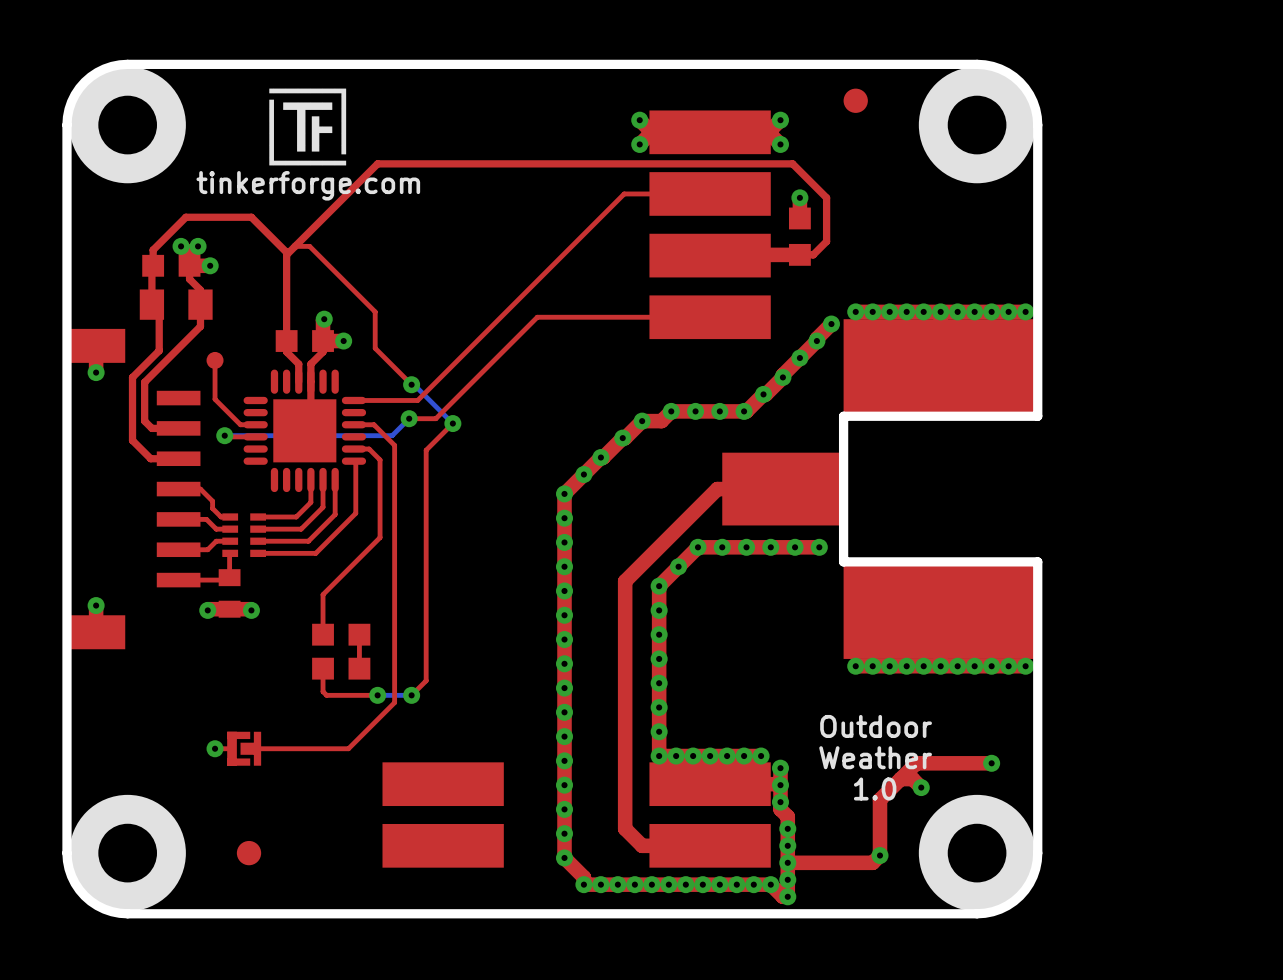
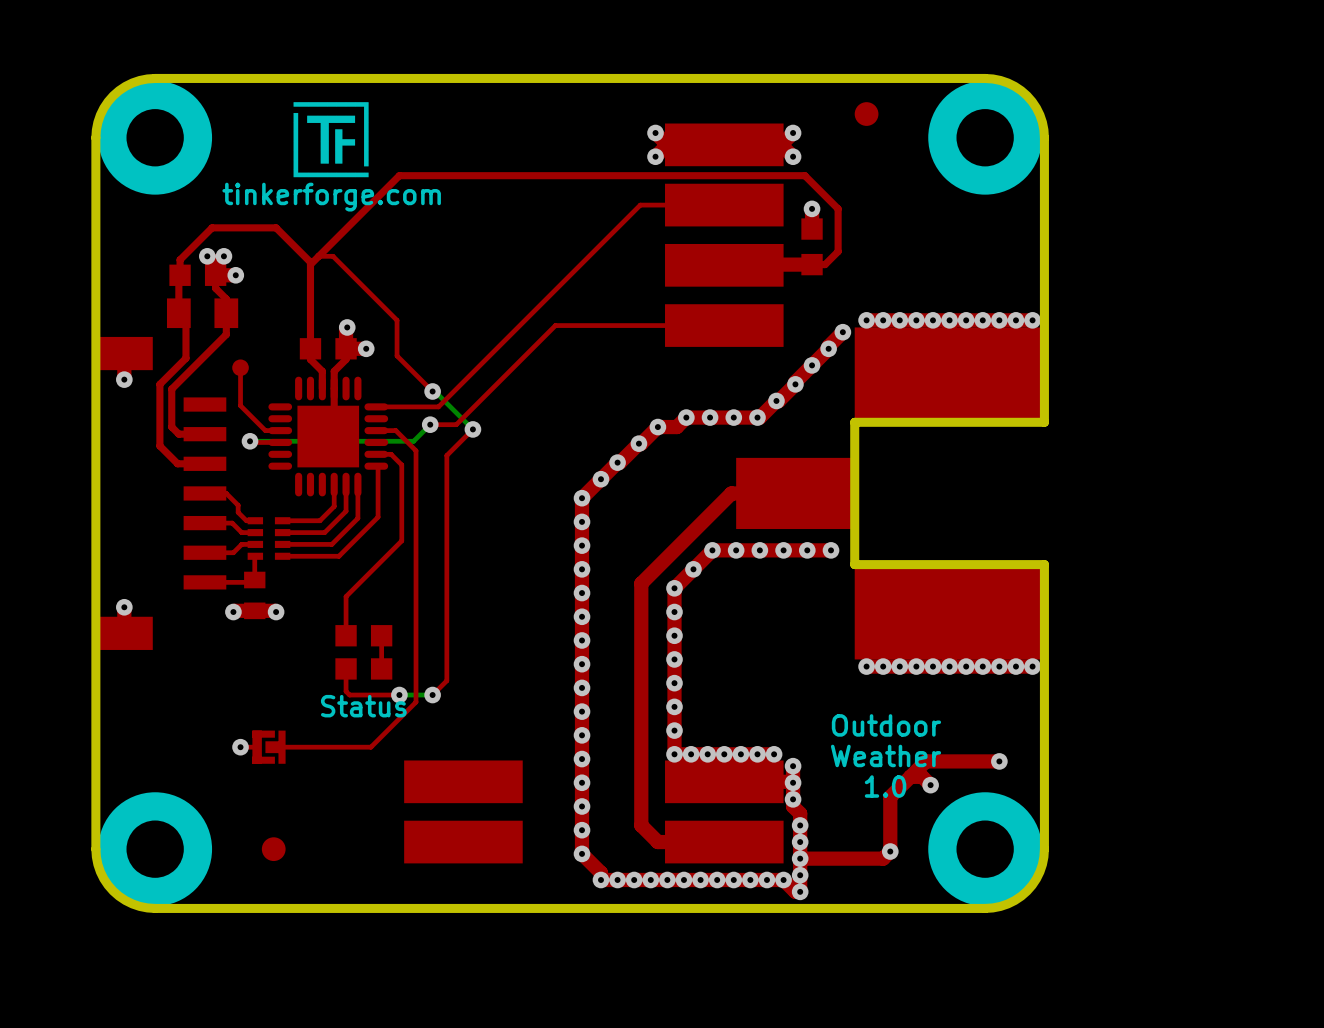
text: none -> Status (363, 706)

